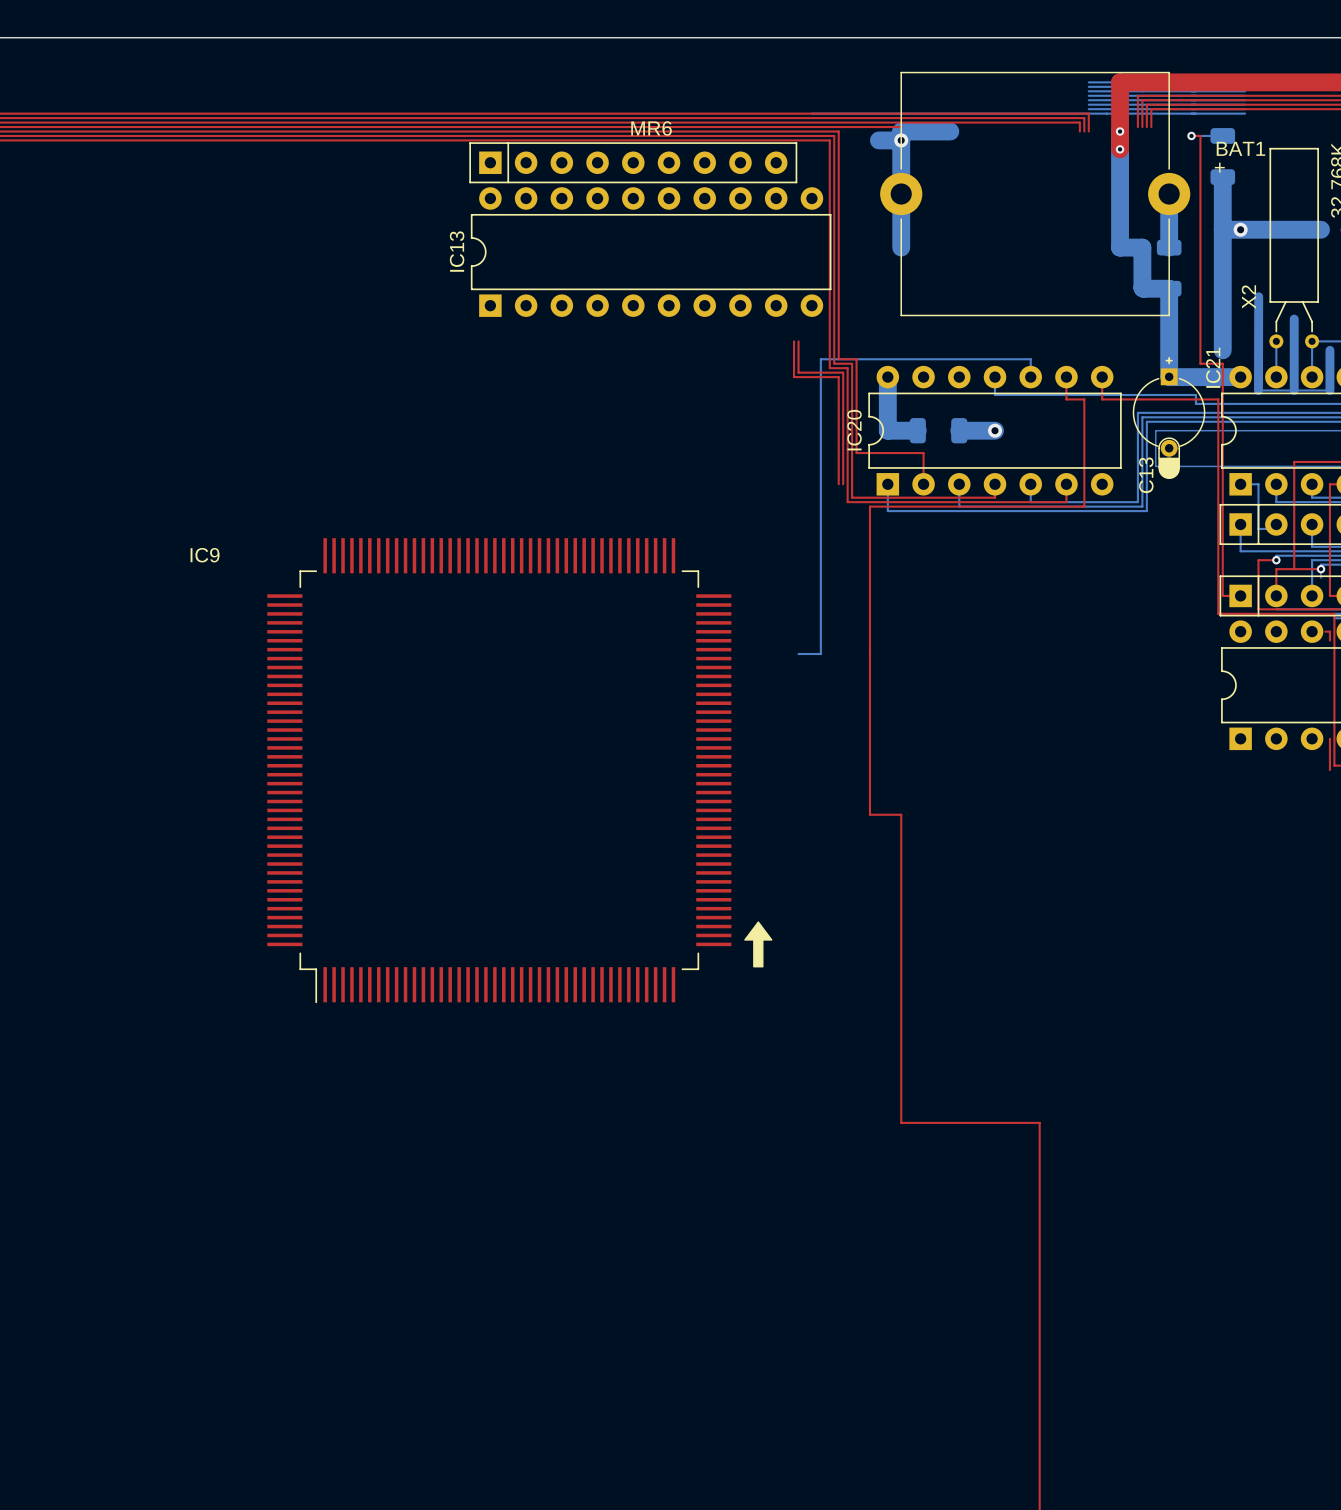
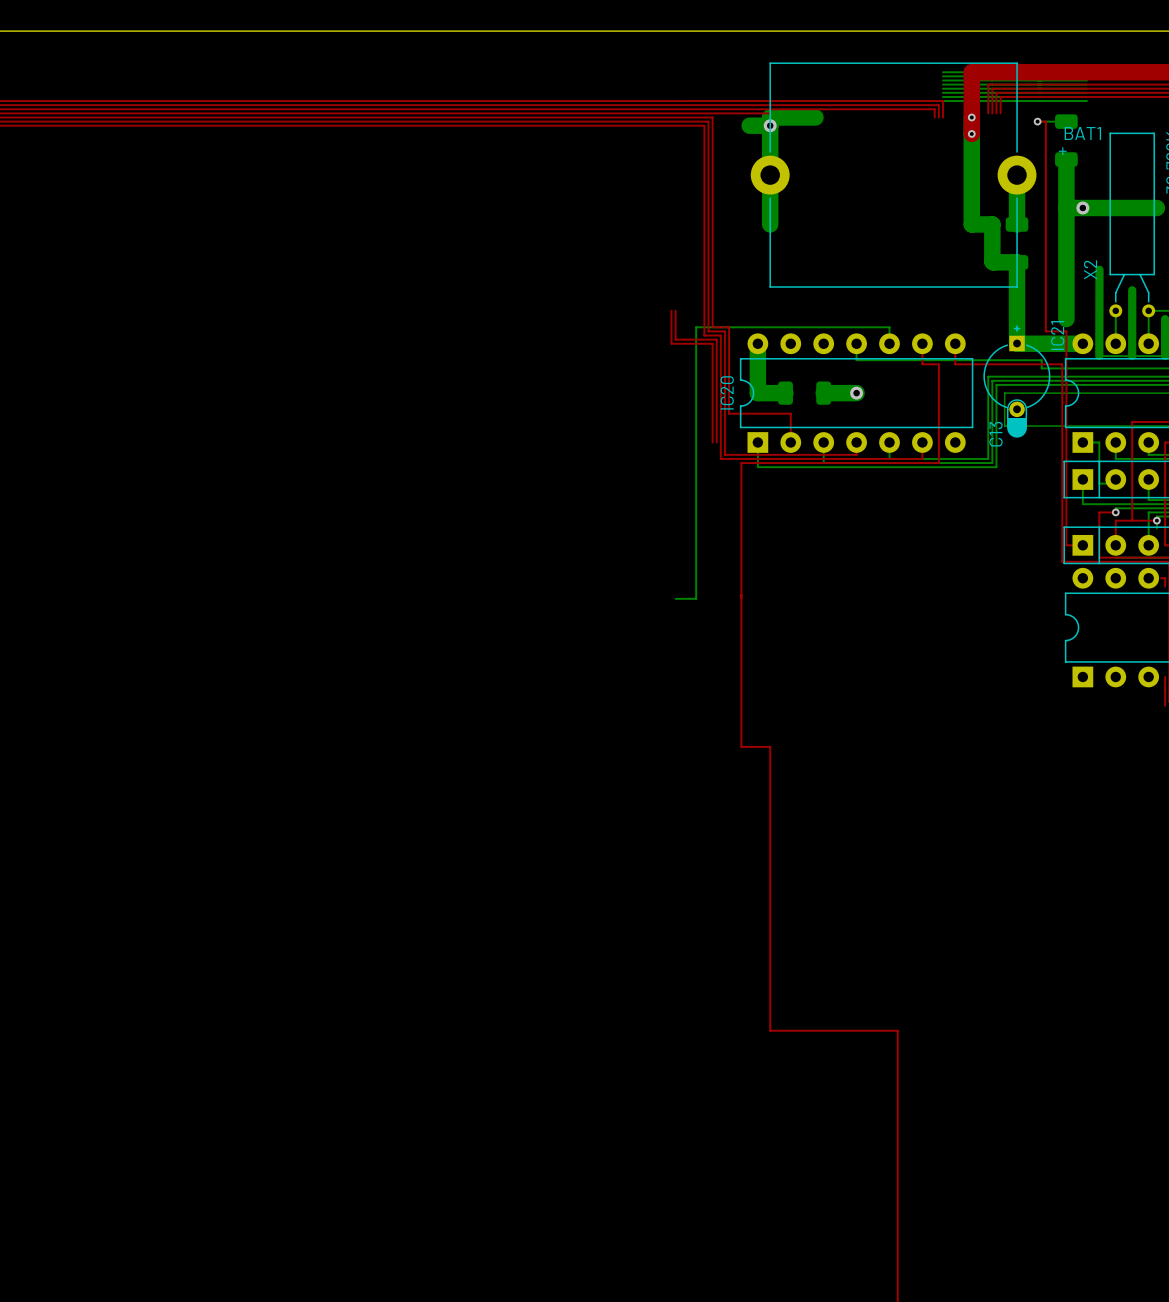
MR6: (633, 162) -> none
IC13: (651, 252) -> none
IC9: (519, 770) -> none

